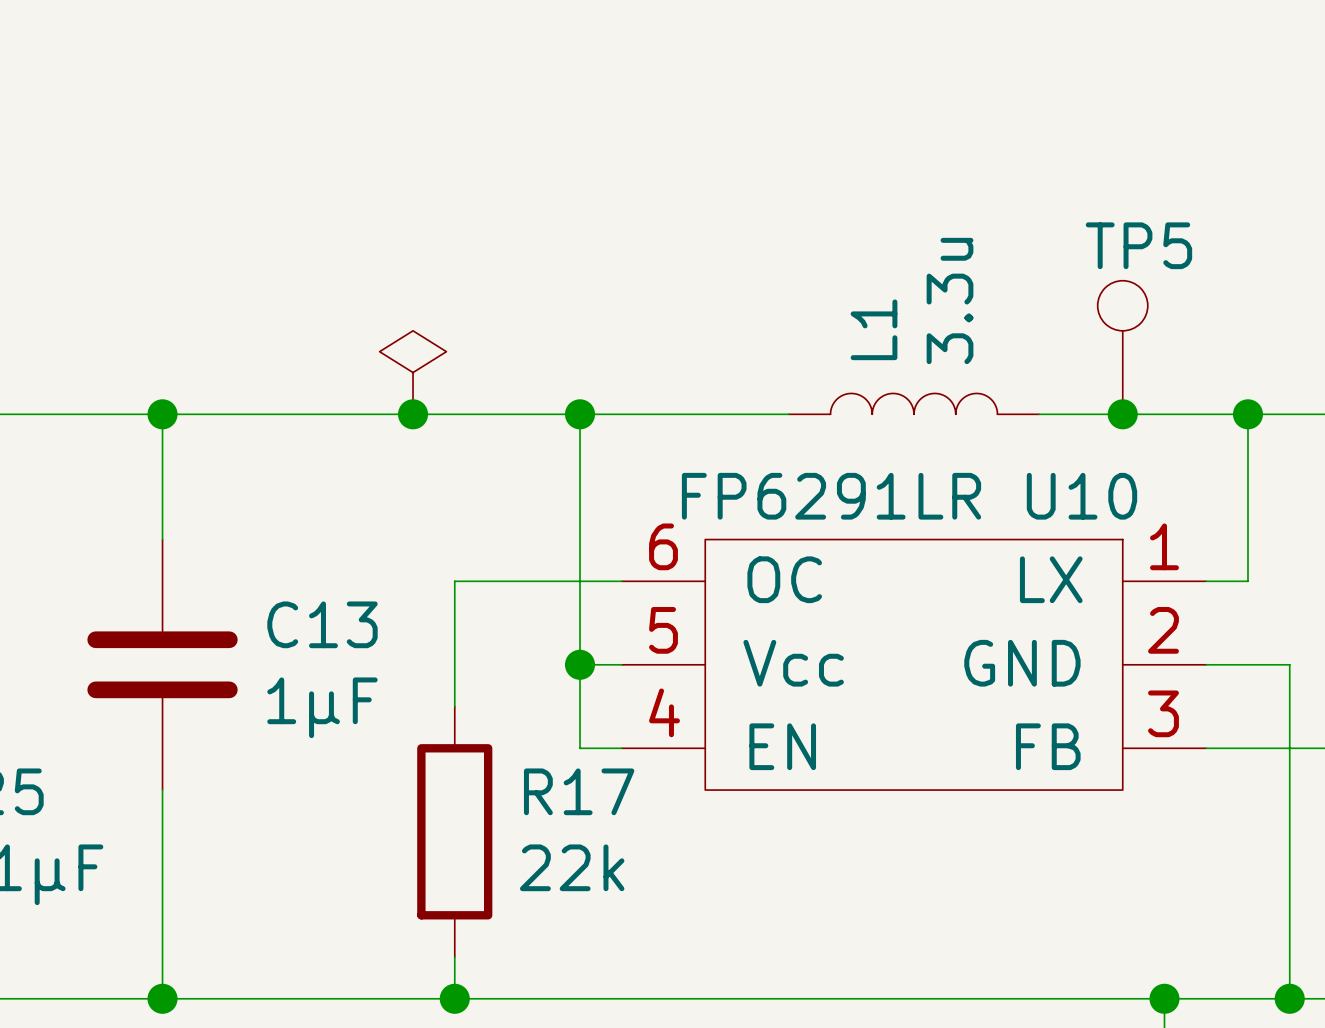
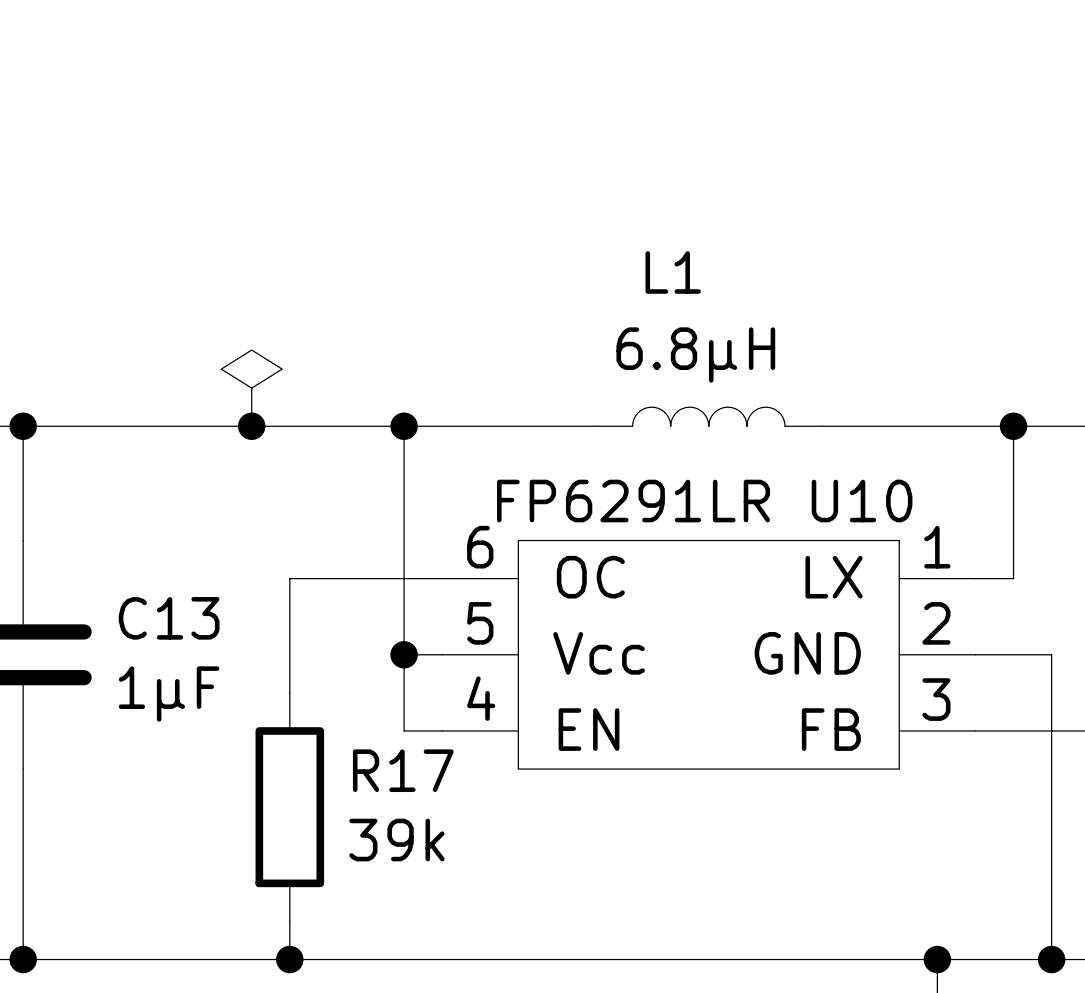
L1 value: 3.3u (950, 300) -> 6.8µH (695, 355)
L1 name rotation: 0° (874, 329) -> 90° clockwise (673, 272)
TP5: (1122, 347) -> none
junction: (1122, 414) -> none
R17 value: 22k (572, 867) -> 39k (396, 840)

